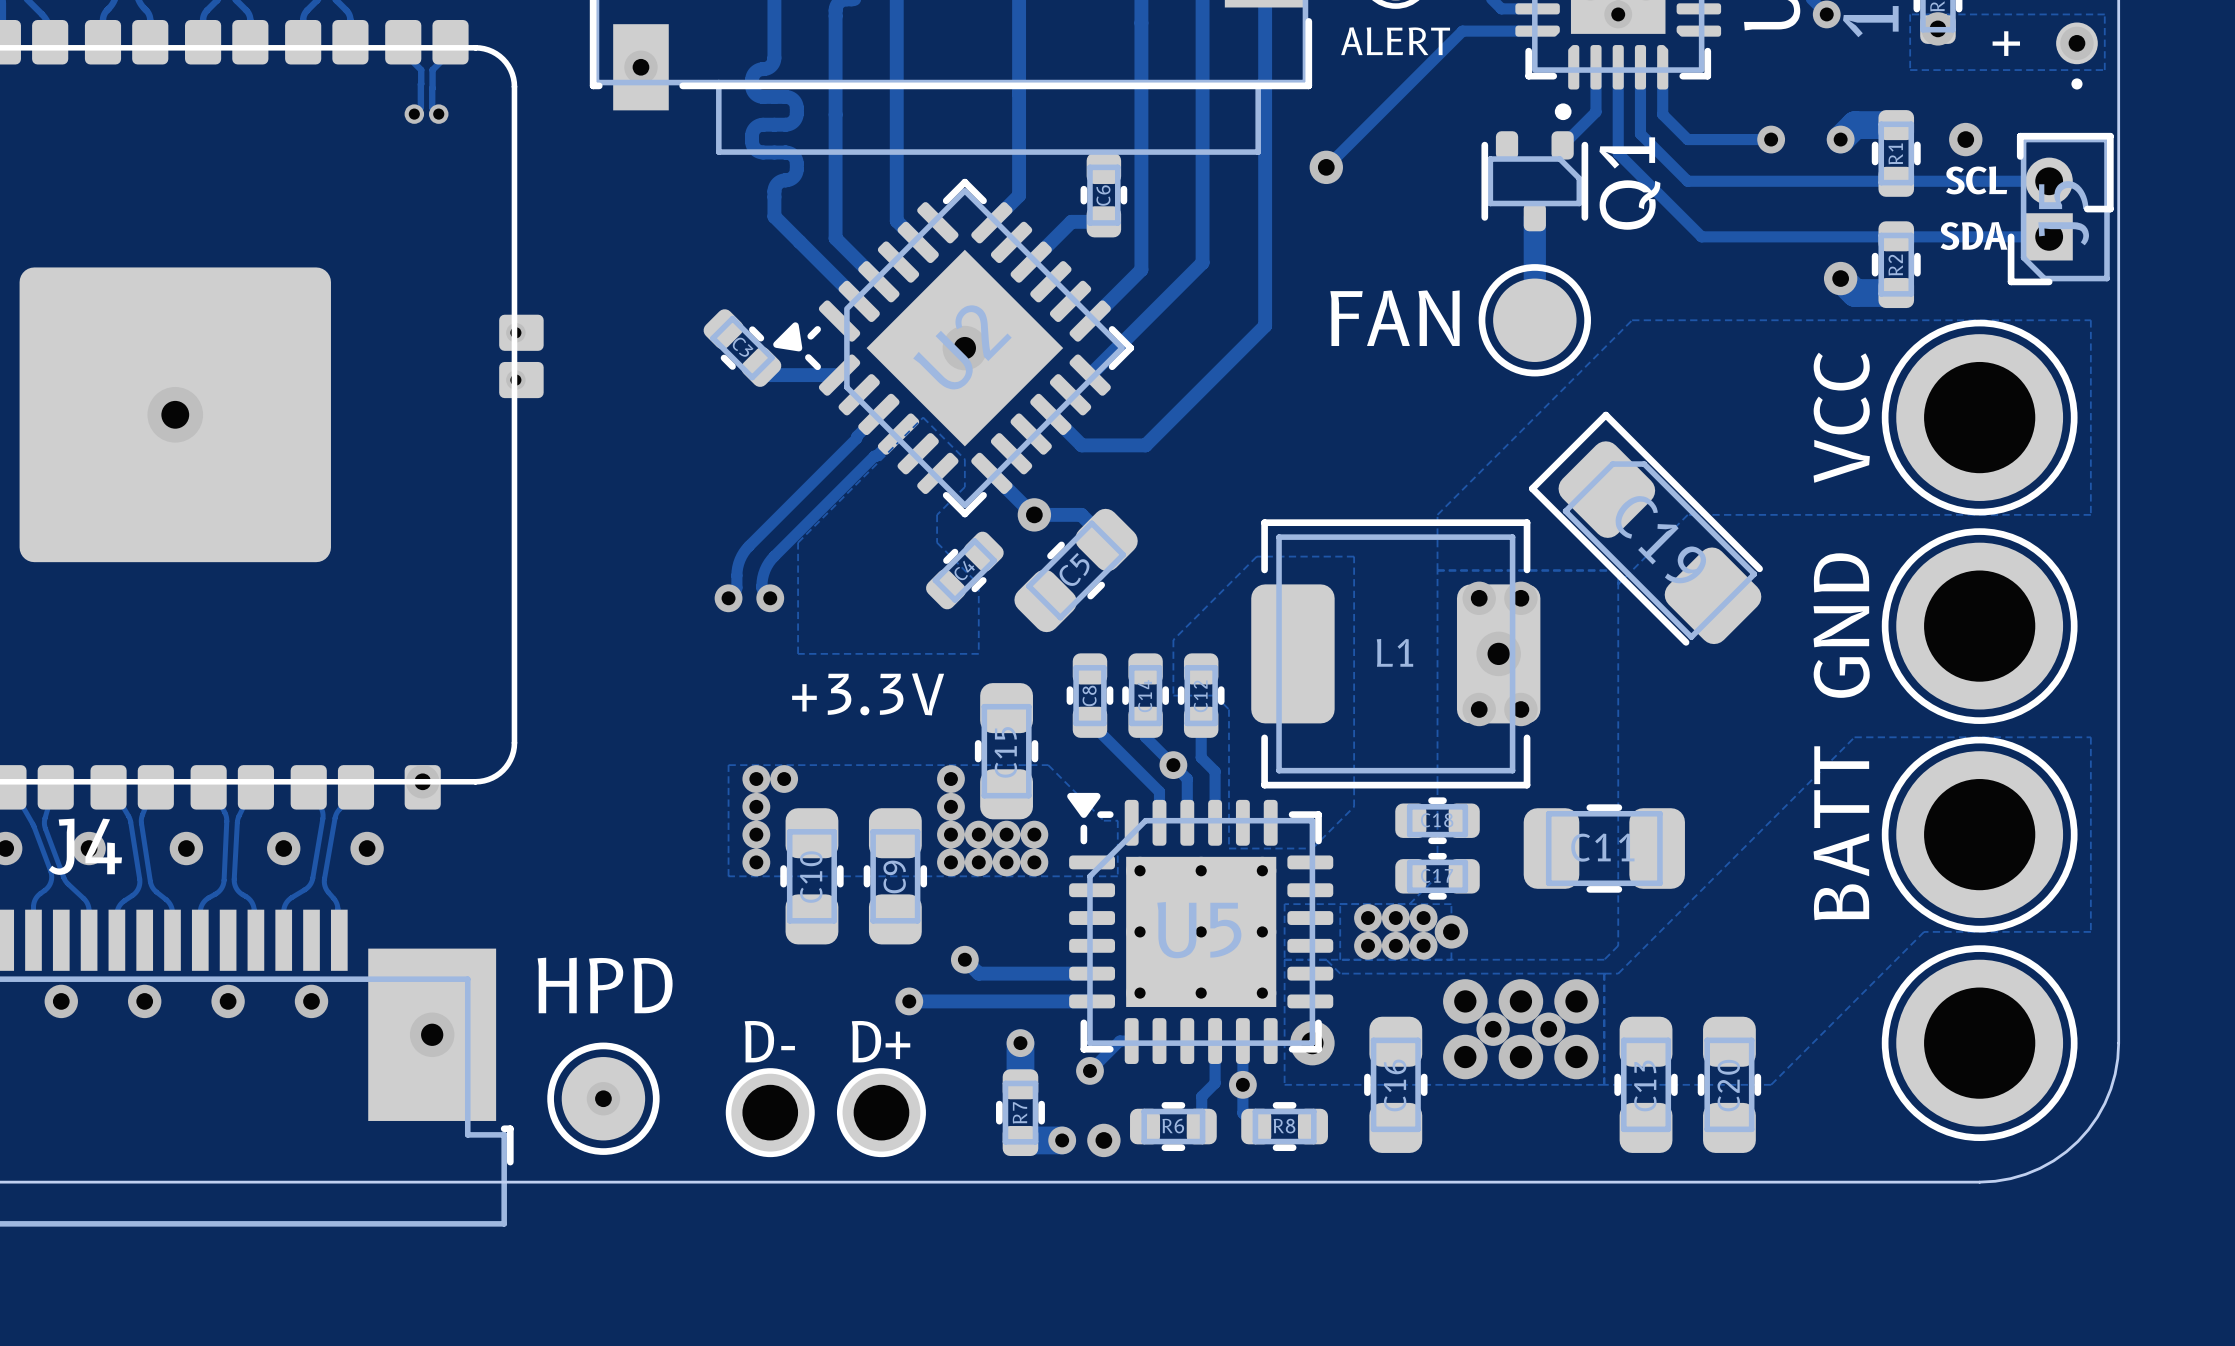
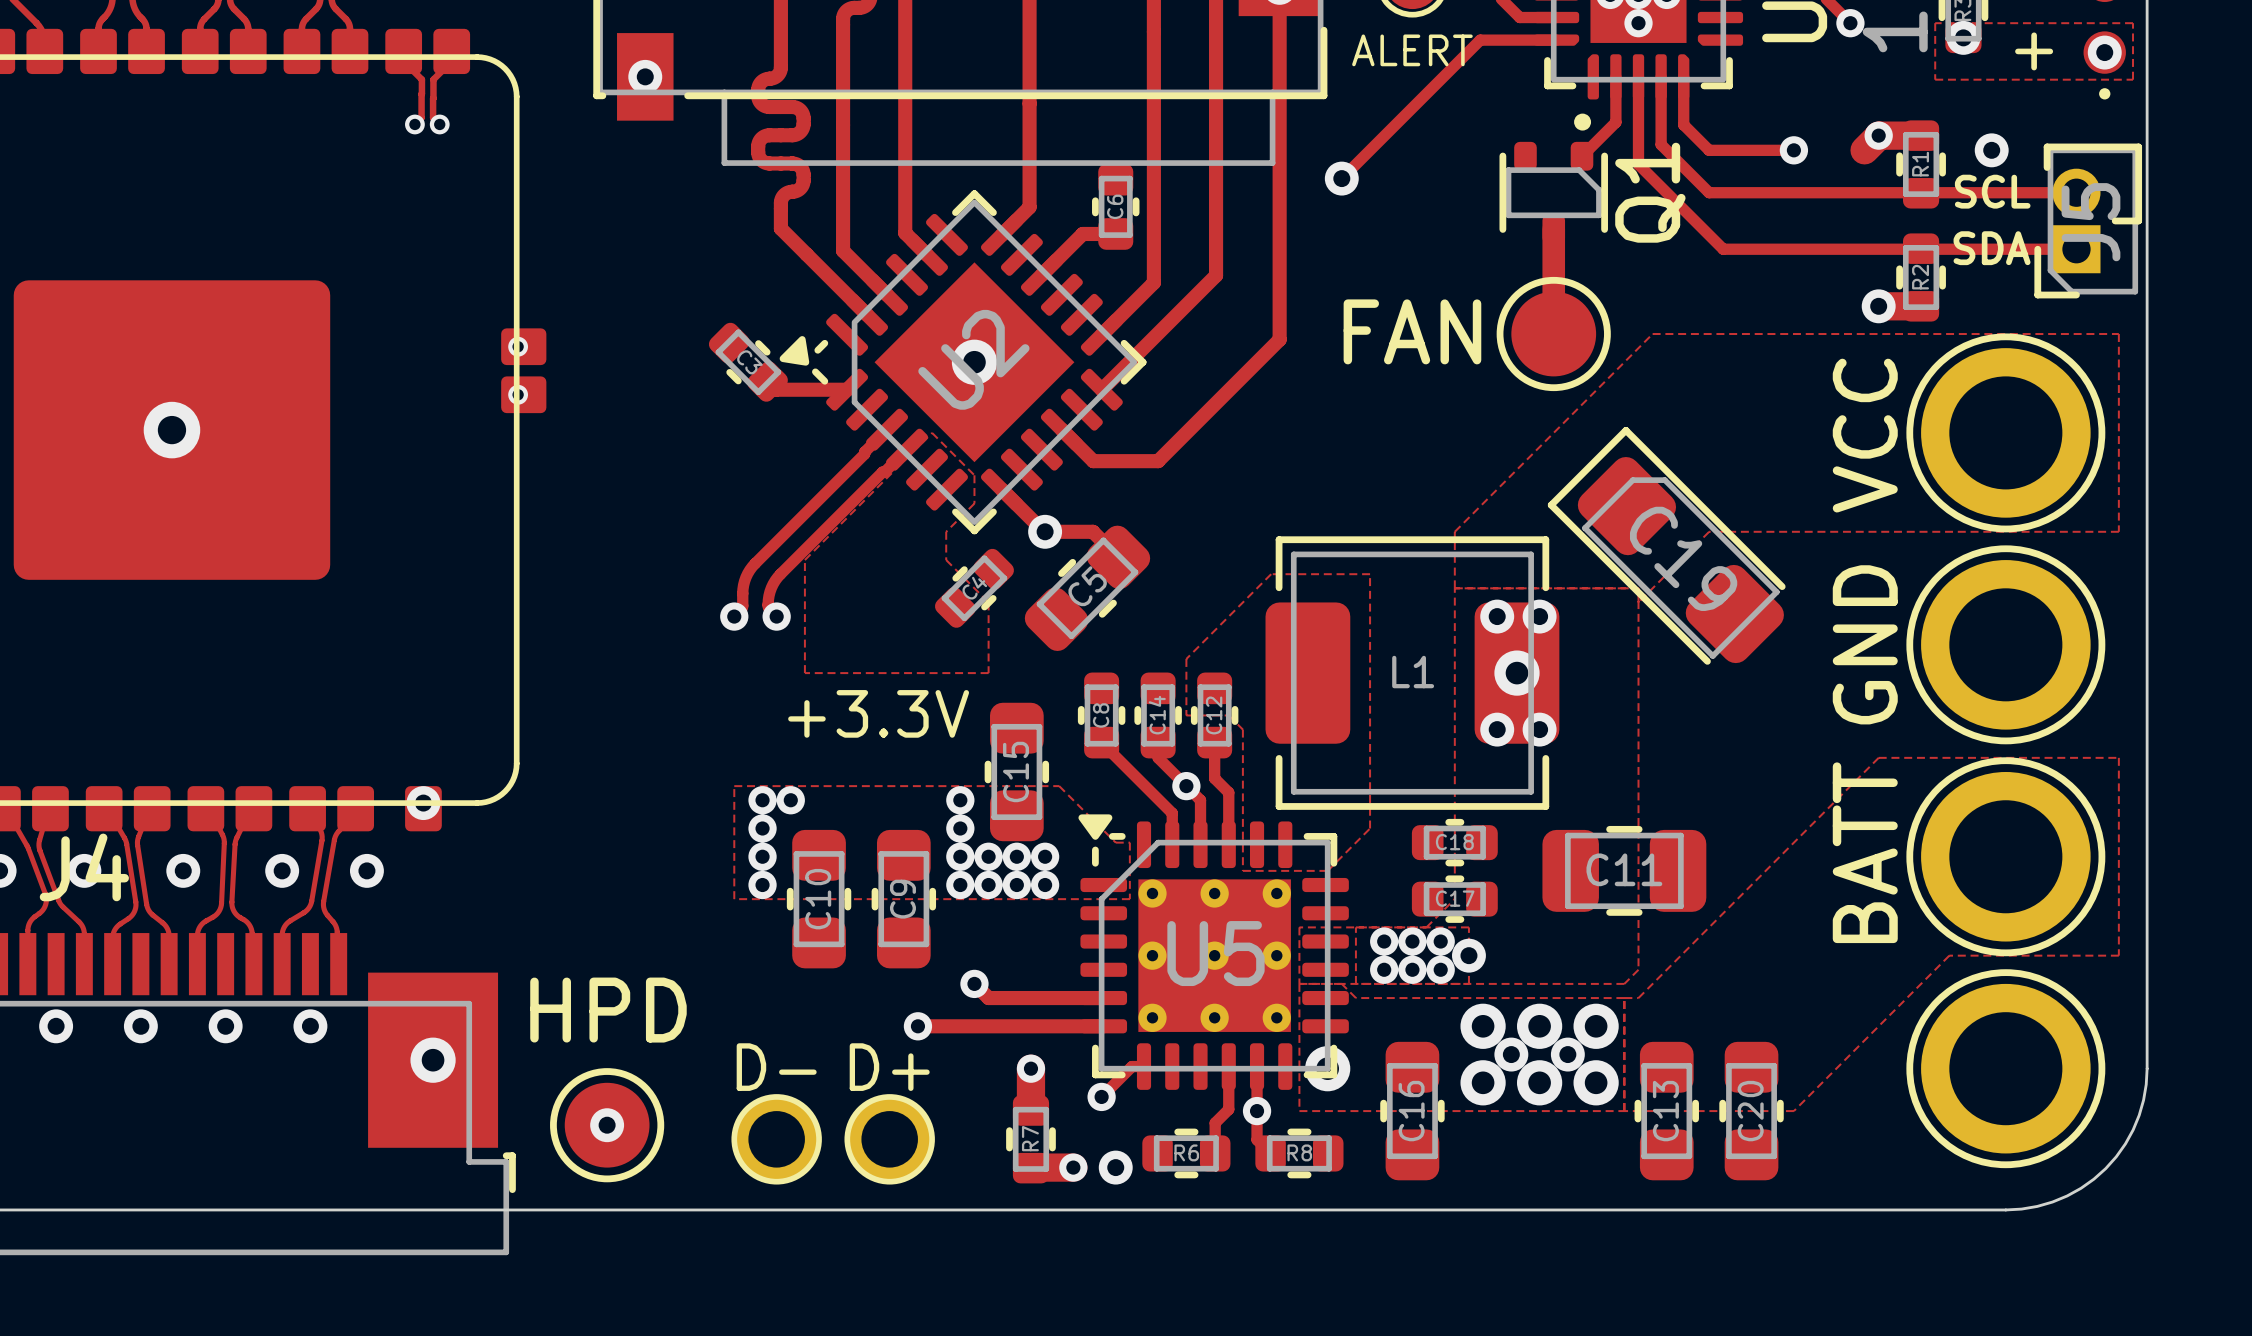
via position: (1840, 139) -> (1878, 135)
via position: (1840, 278) -> (1878, 306)

